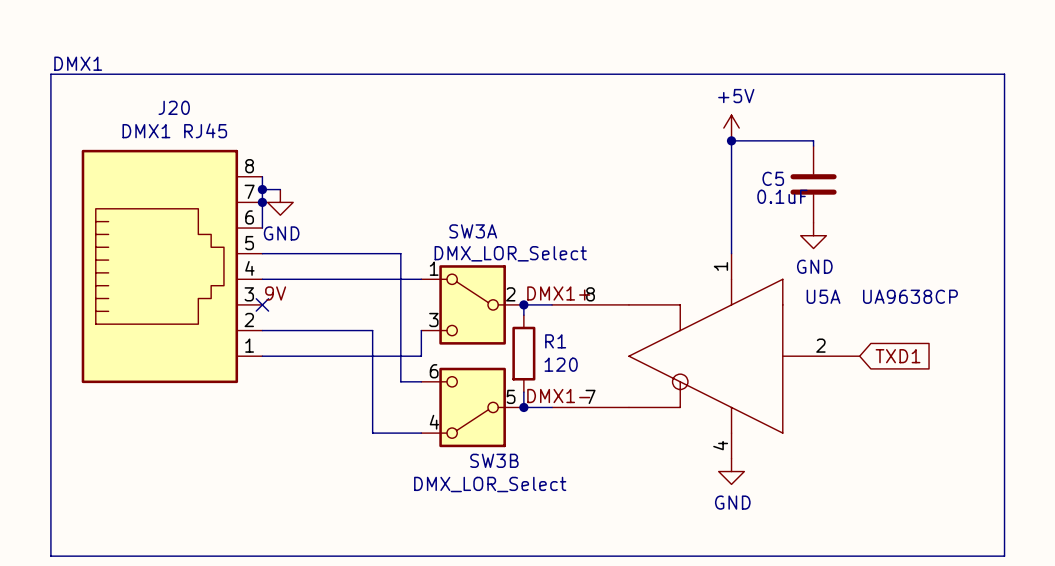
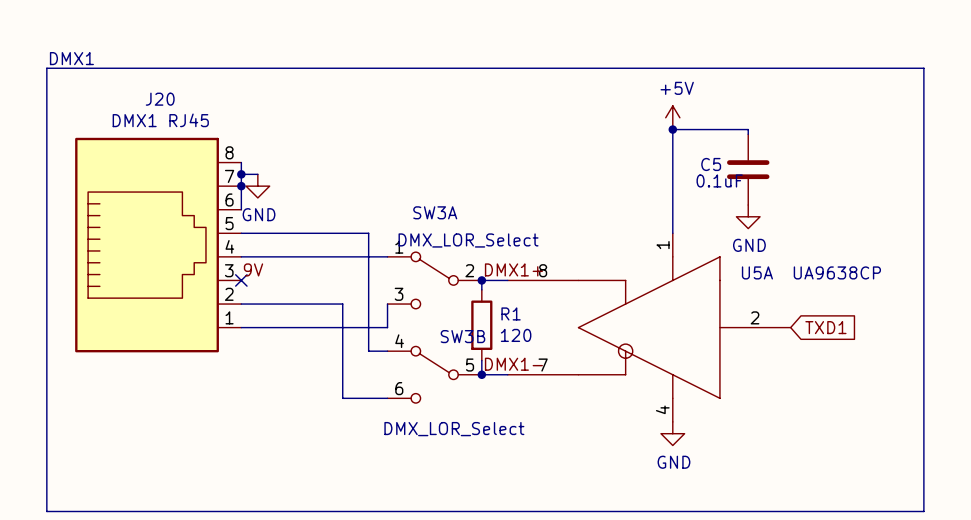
SW3A symbol: [421, 265, 524, 345] -> [387, 252, 482, 309]
SW3B symbol: [421, 367, 524, 448] -> [387, 346, 482, 404]
SW3B name position: SW3B (494, 460) -> SW3B (462, 336)

